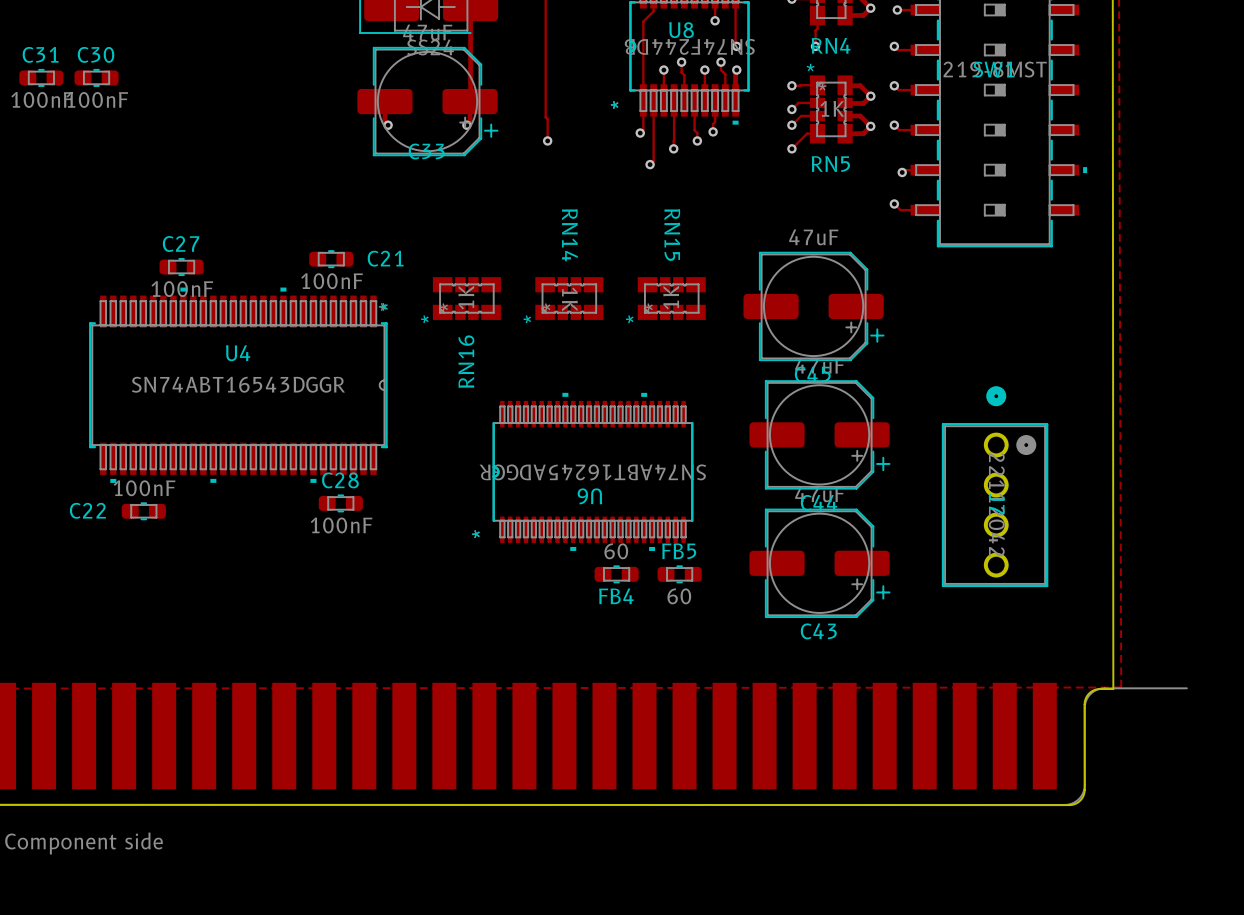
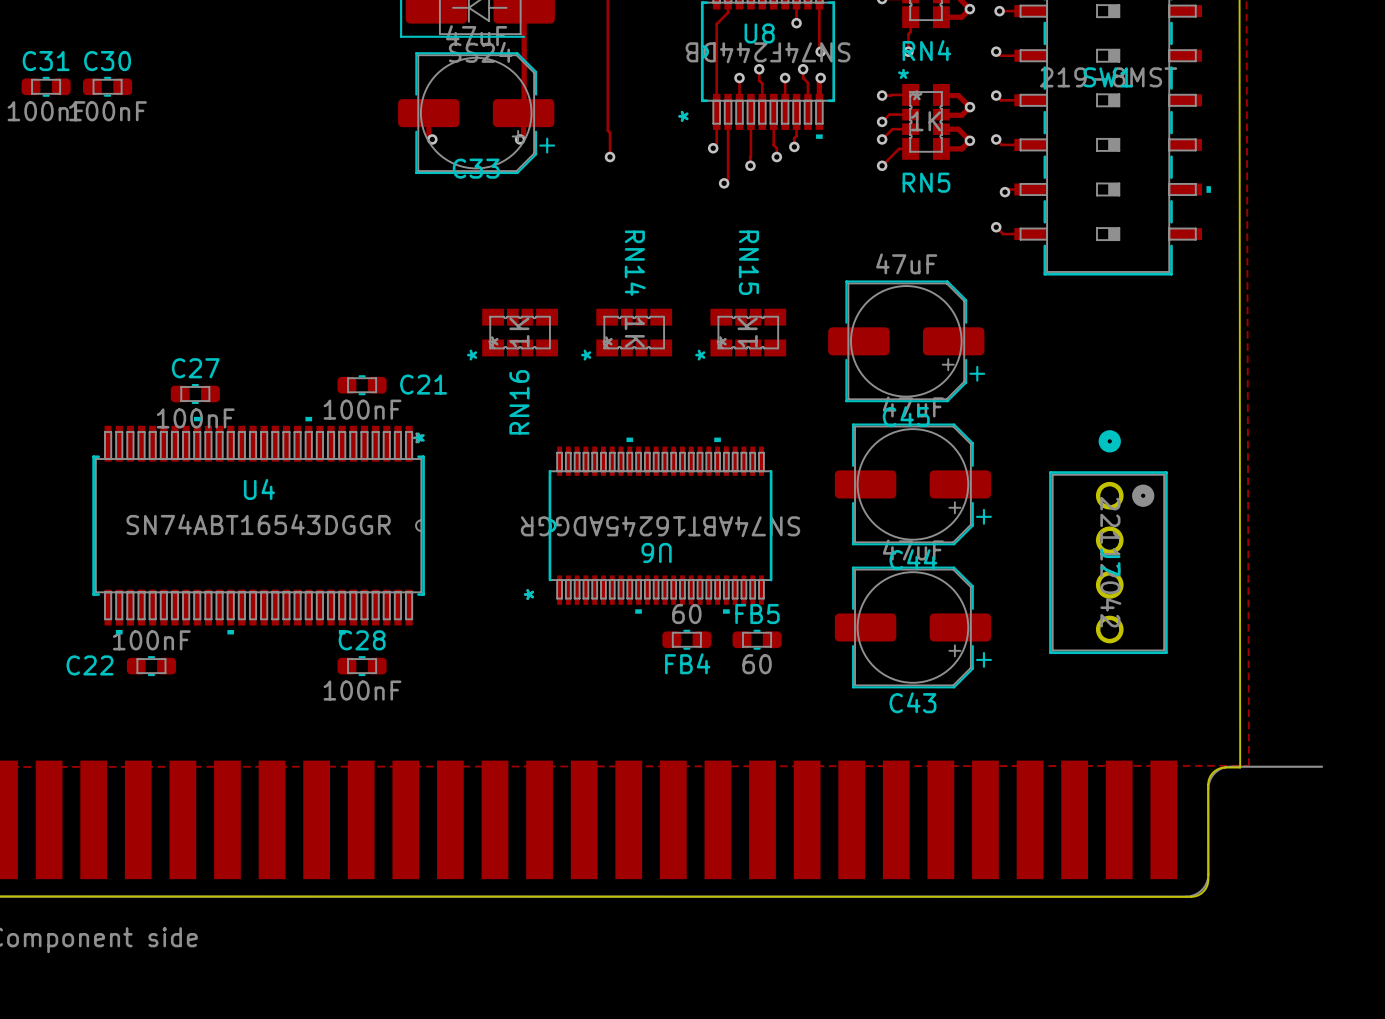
C21 position: (331, 259) -> (362, 385)
C27 position: (181, 267) -> (195, 394)
U4 position: (238, 385) -> (258, 525)
C28 position: (340, 503) -> (362, 666)
C22 position: (143, 511) -> (151, 666)

